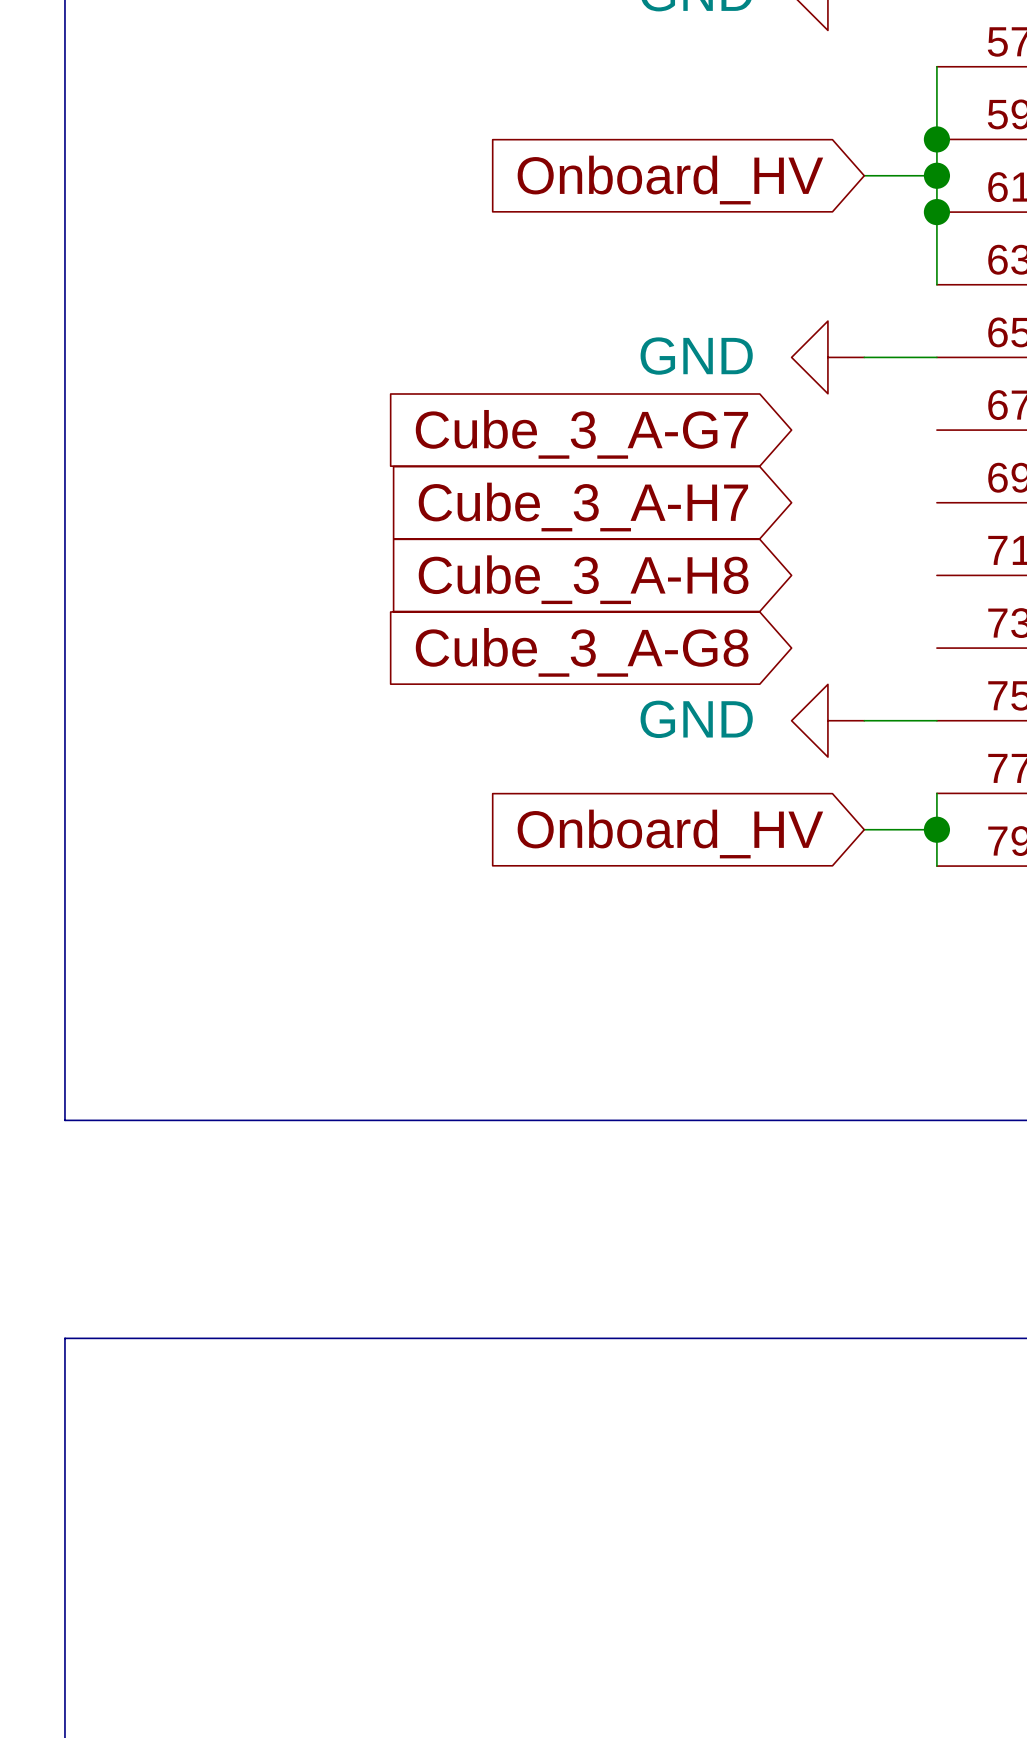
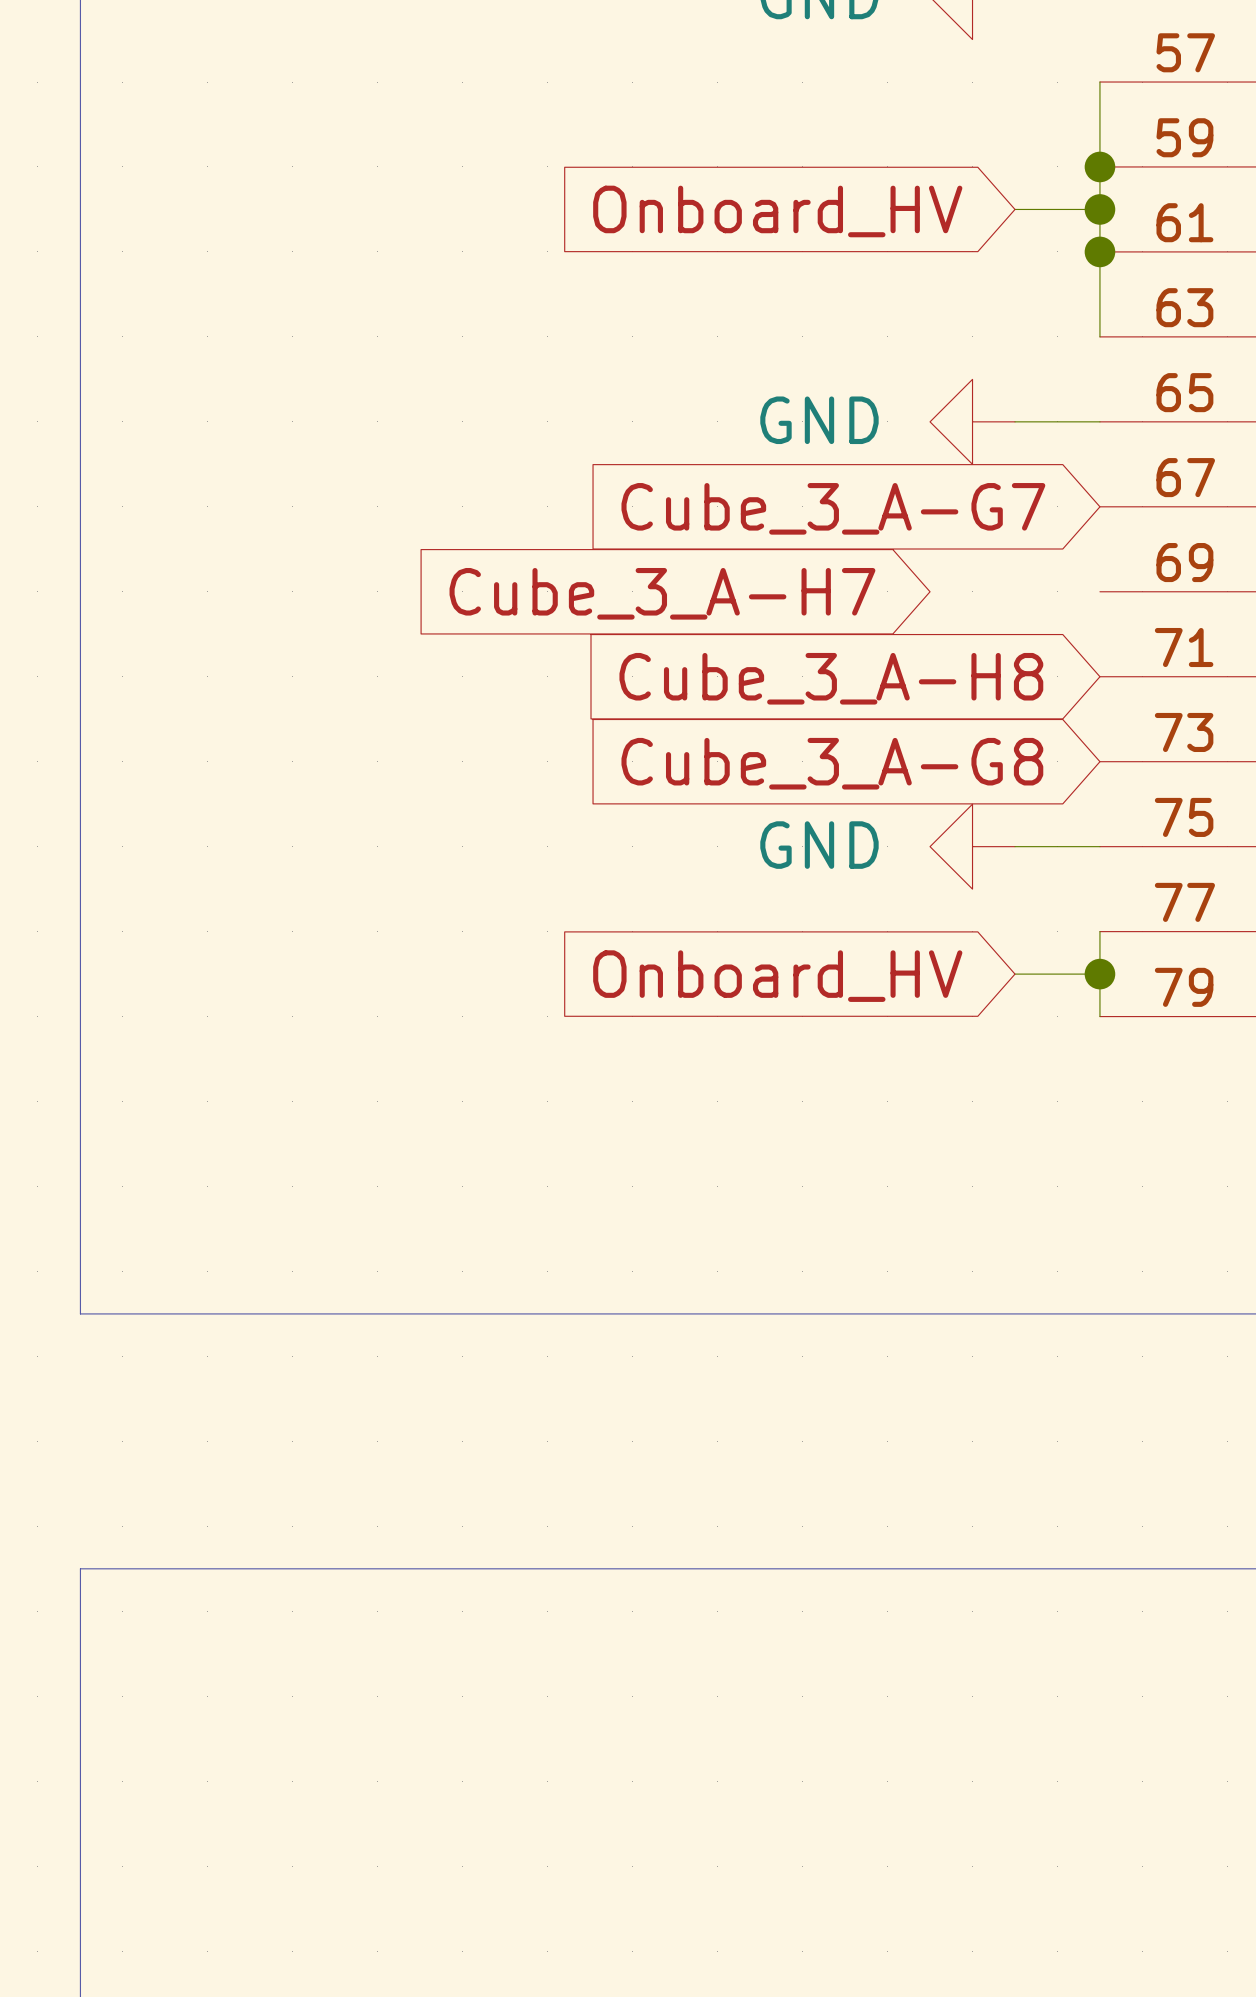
global label position: Cube_3_A-G7 (581, 434) -> Cube_3_A-G7 (833, 508)
global label position: Cube_3_A-H8 (583, 579) -> Cube_3_A-H8 (831, 678)
global label position: Cube_3_A-G8 (582, 652) -> Cube_3_A-G8 (832, 763)

